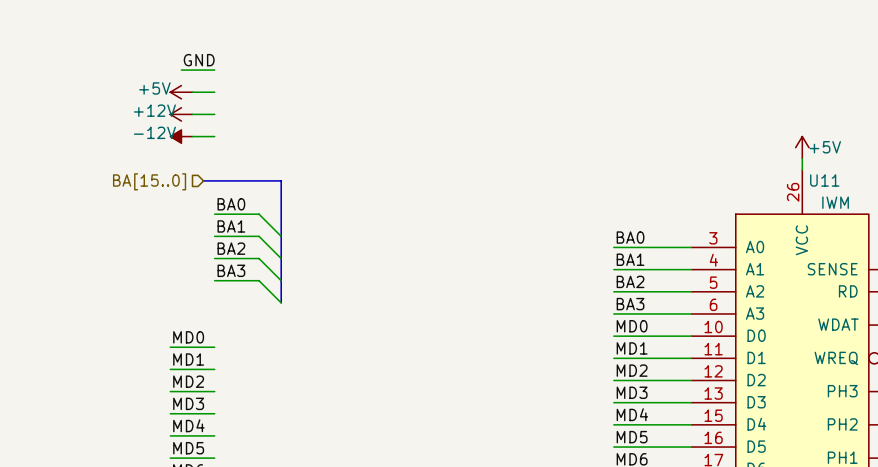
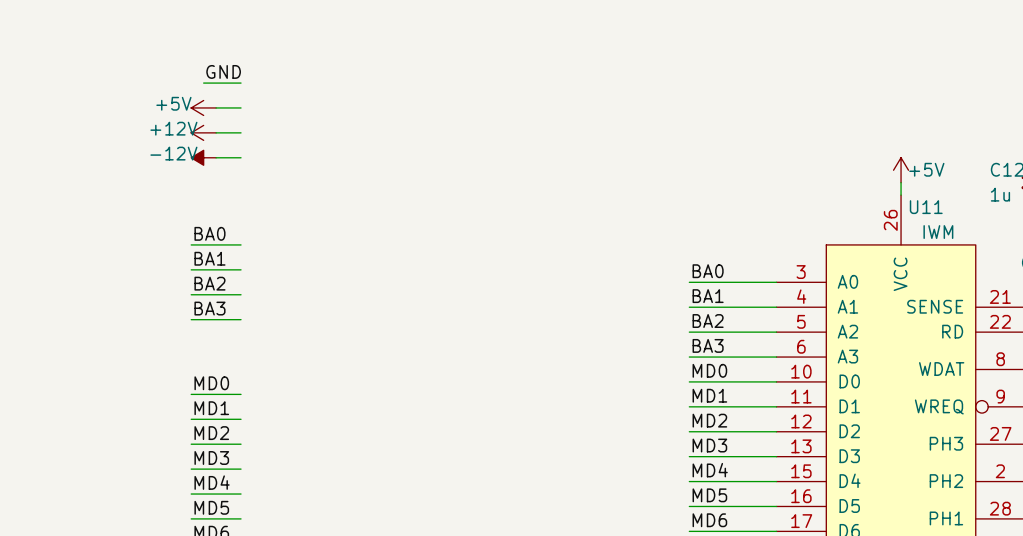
bus: (203, 180) (281, 180) (281, 302) -> none
hierarchical label: BA[15..0] (149, 181) -> none
label position: BA0 (231, 204) -> BA0 (209, 233)
wire: (214, 214) (259, 214) (281, 236) -> (241, 244) (191, 244)
label position: BA1 (231, 226) -> BA1 (209, 258)
wire: (214, 236) (259, 236) (281, 258) -> (241, 269) (191, 269)
label position: BA2 (231, 248) -> BA2 (209, 283)
wire: (214, 258) (259, 258) (281, 280) -> (241, 294) (191, 294)
label position: BA3 (231, 270) -> BA3 (209, 308)
wire: (214, 280) (259, 280) (281, 302) -> (241, 319) (191, 319)

